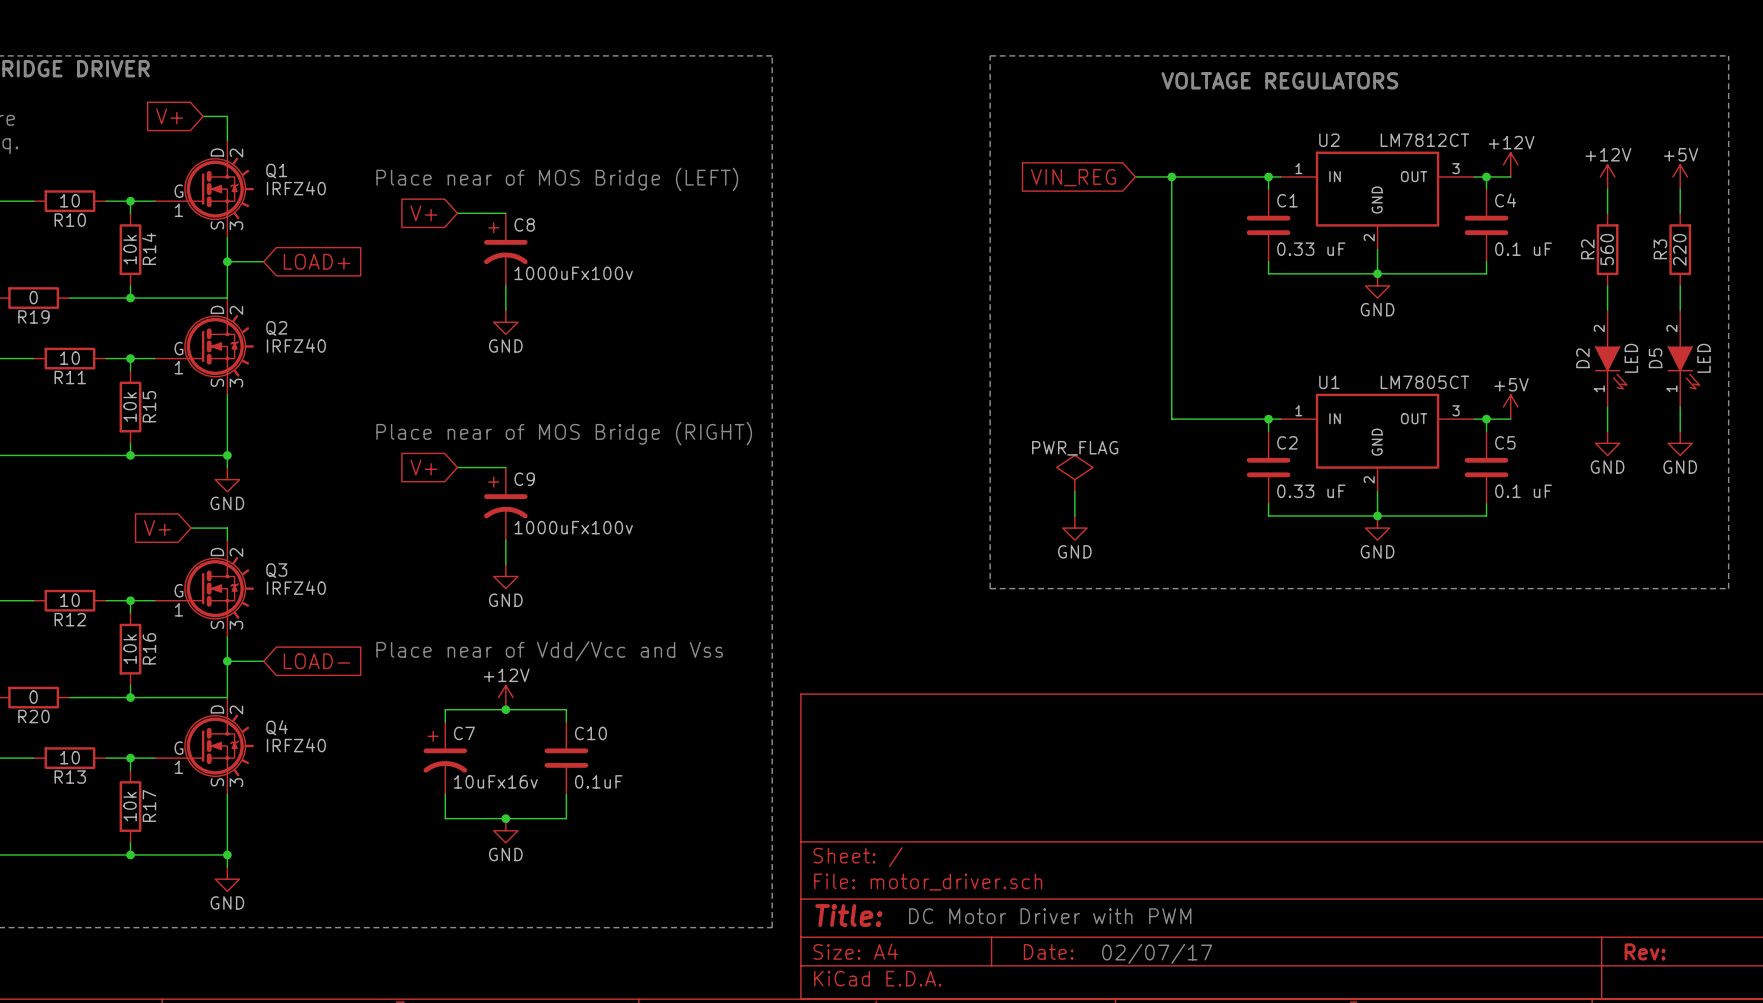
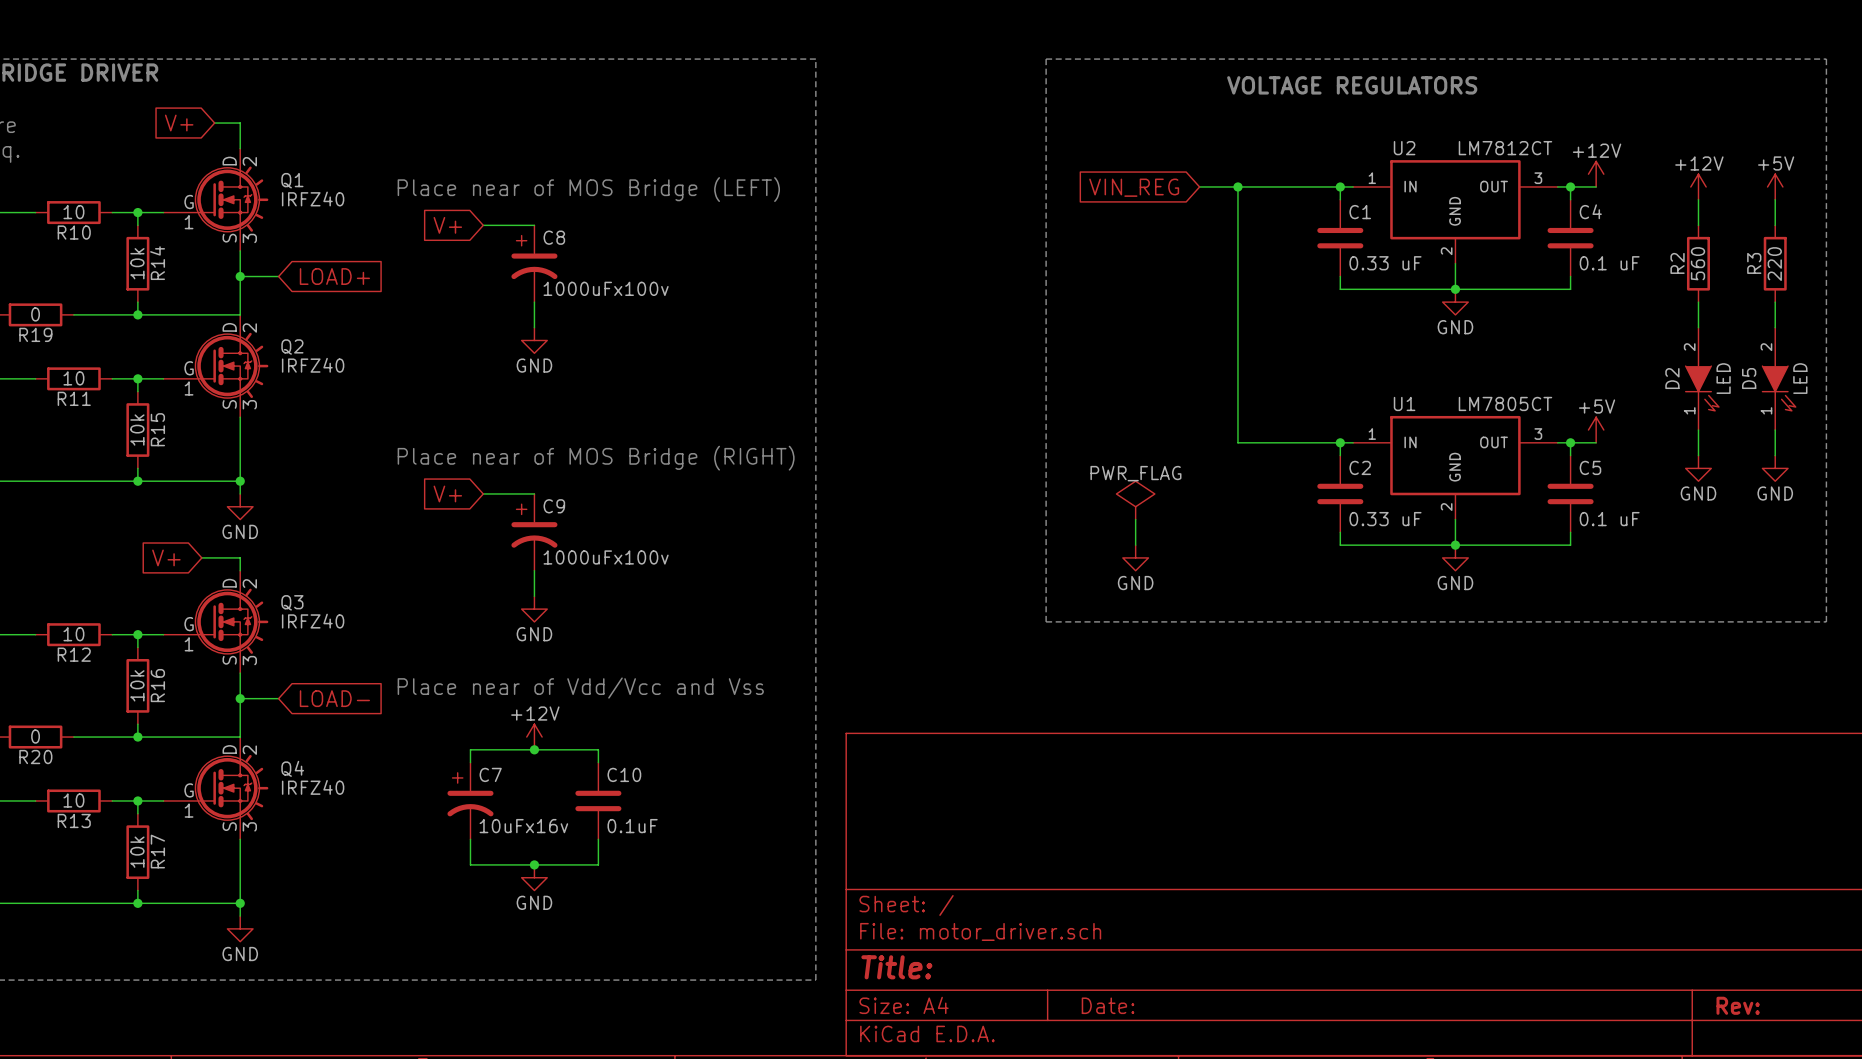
text: DC Motor Driver with PWM (1050, 916) -> none
text: 02/07/17 (1157, 953) -> none

